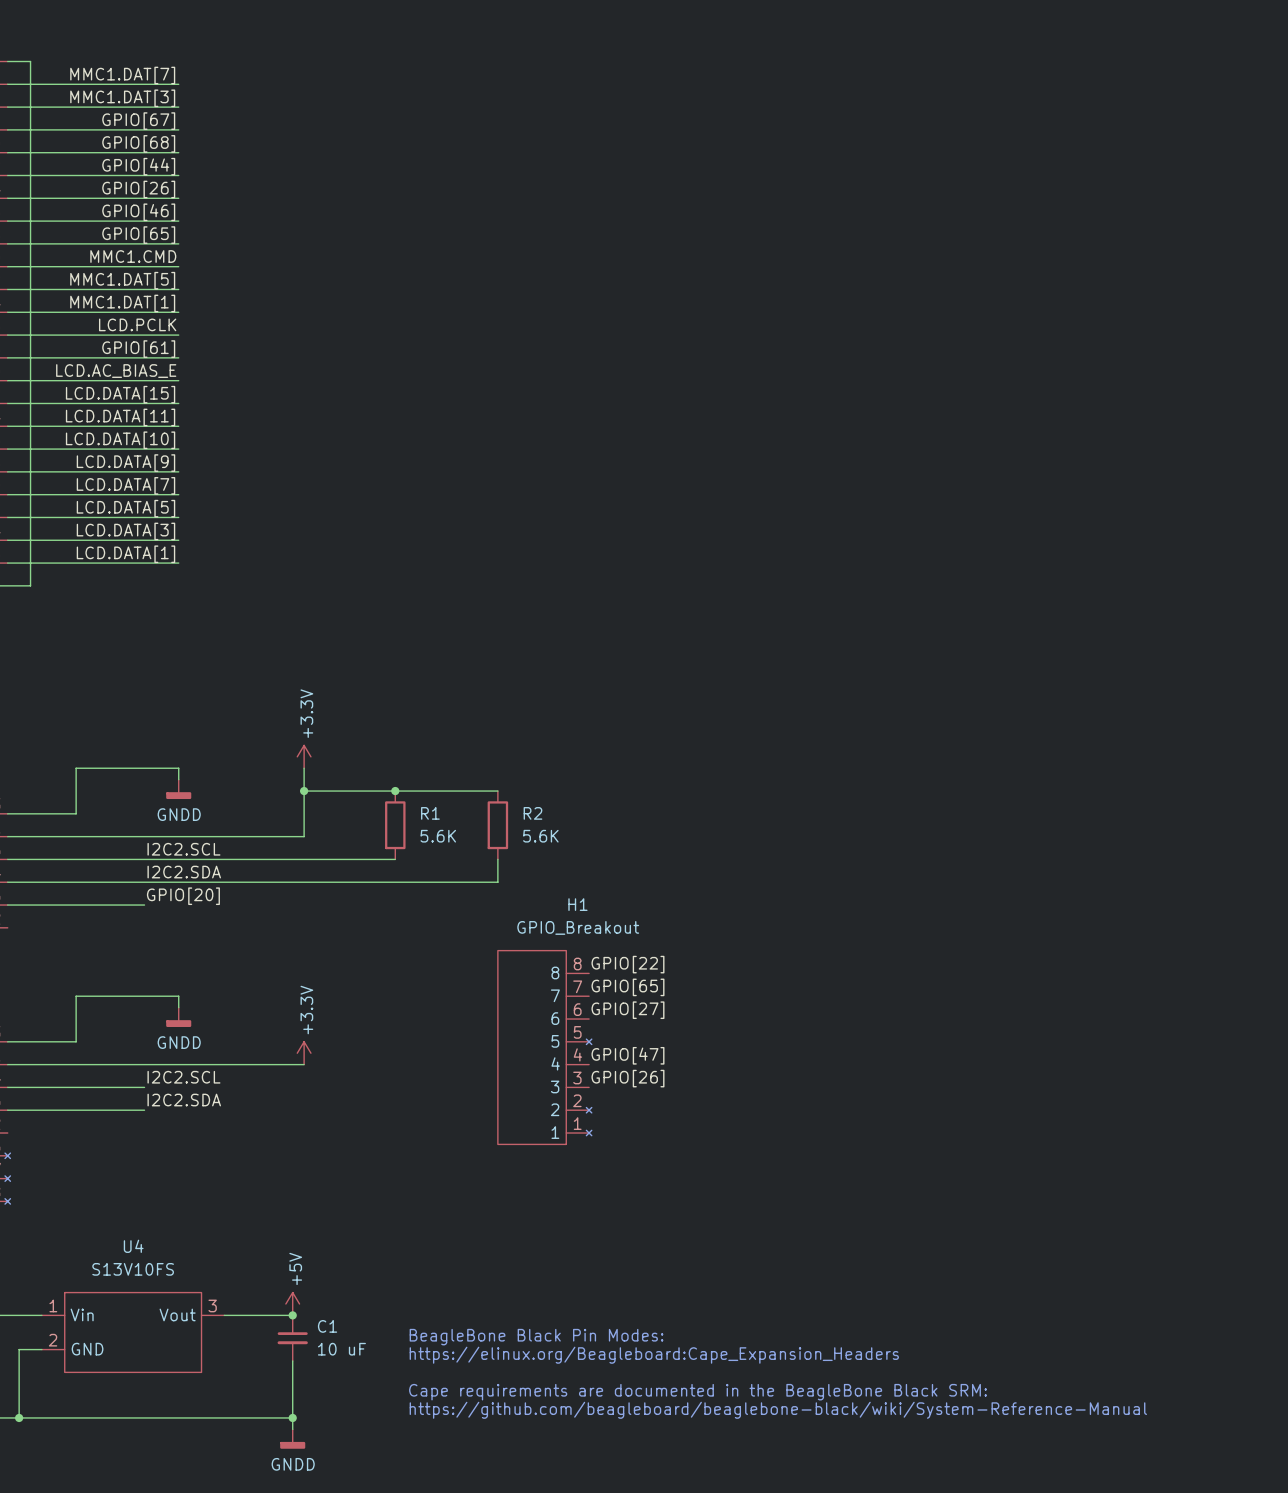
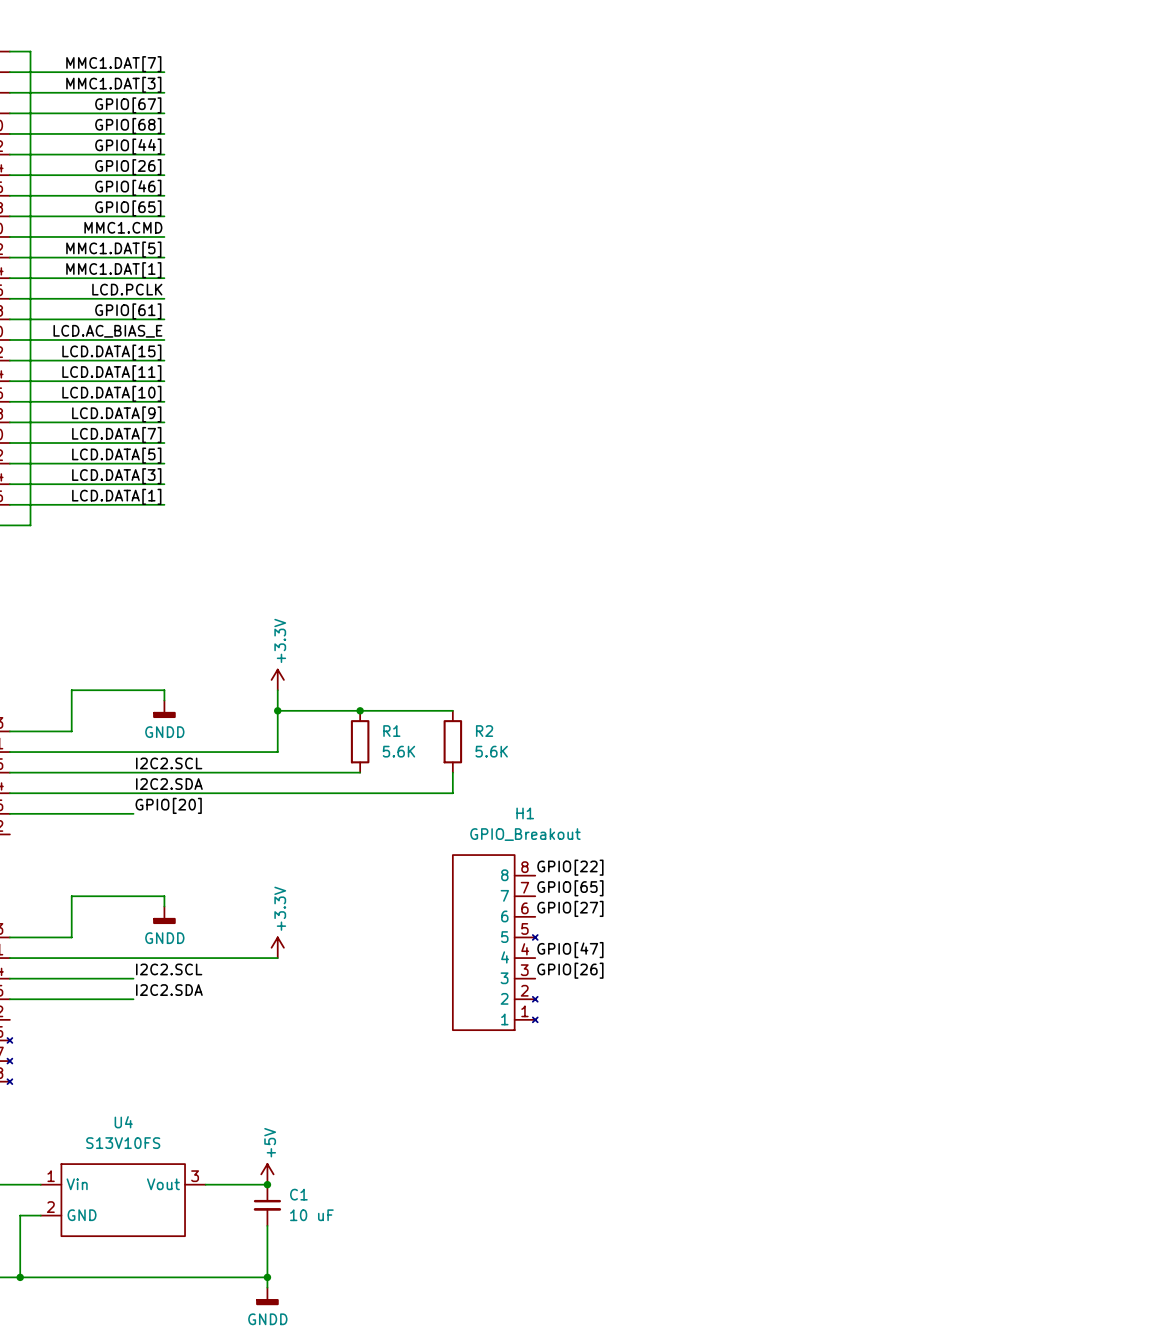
text: BeagleBone Black Pin Modes: (536, 1337) -> none
text: https://elinux.org/Beagleboard:Cape_Expansion_Headers (654, 1355) -> none
text: Cape requirements are documented in the BeagleBone Black SRM: (697, 1392) -> none
text: https://github.com/beagleboard/beaglebone-black/wiki/System-Reference-Manual (778, 1410) -> none

